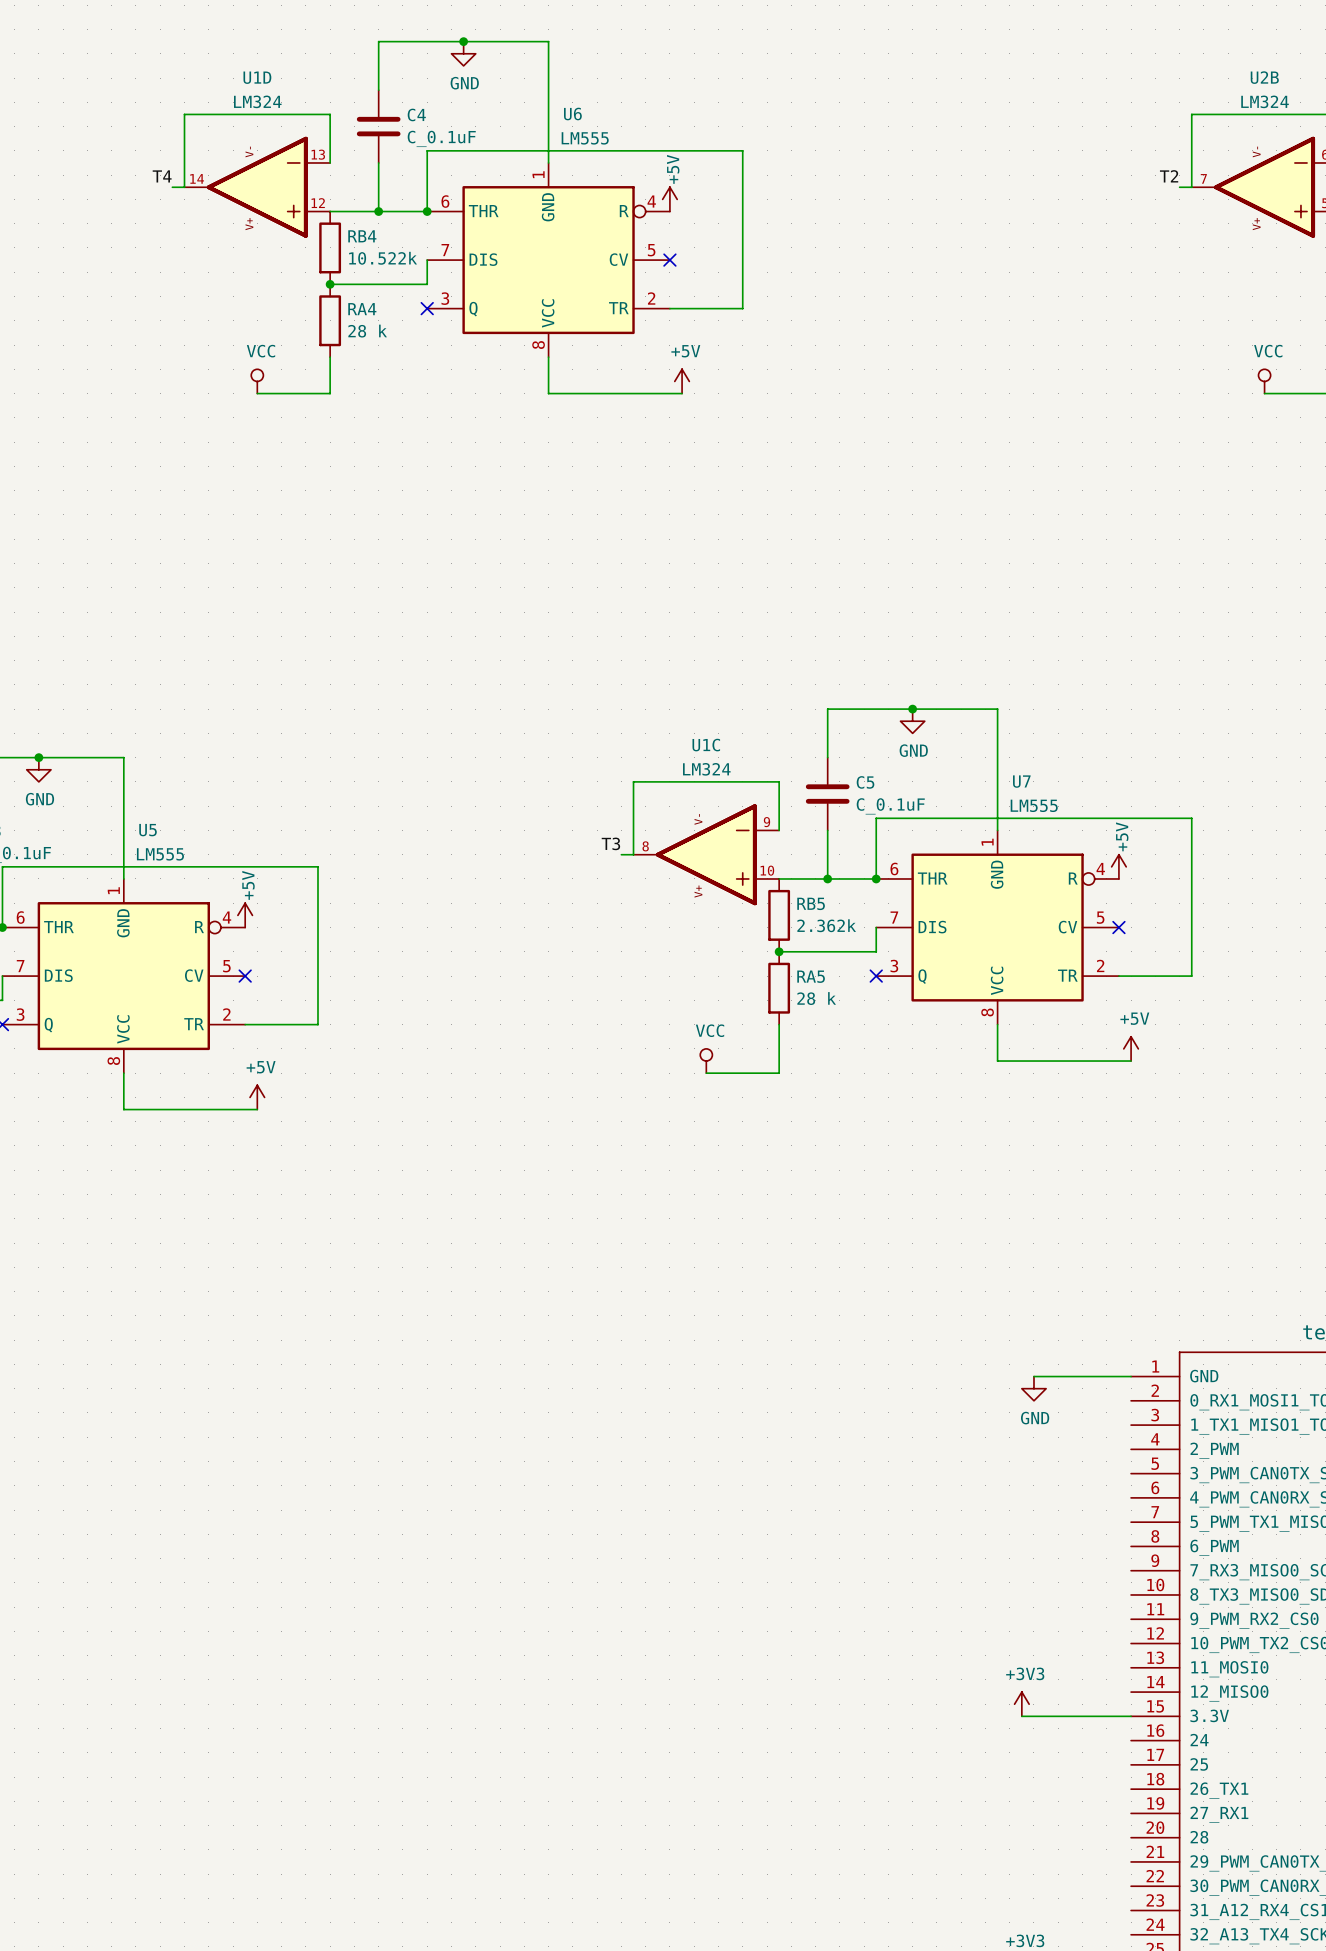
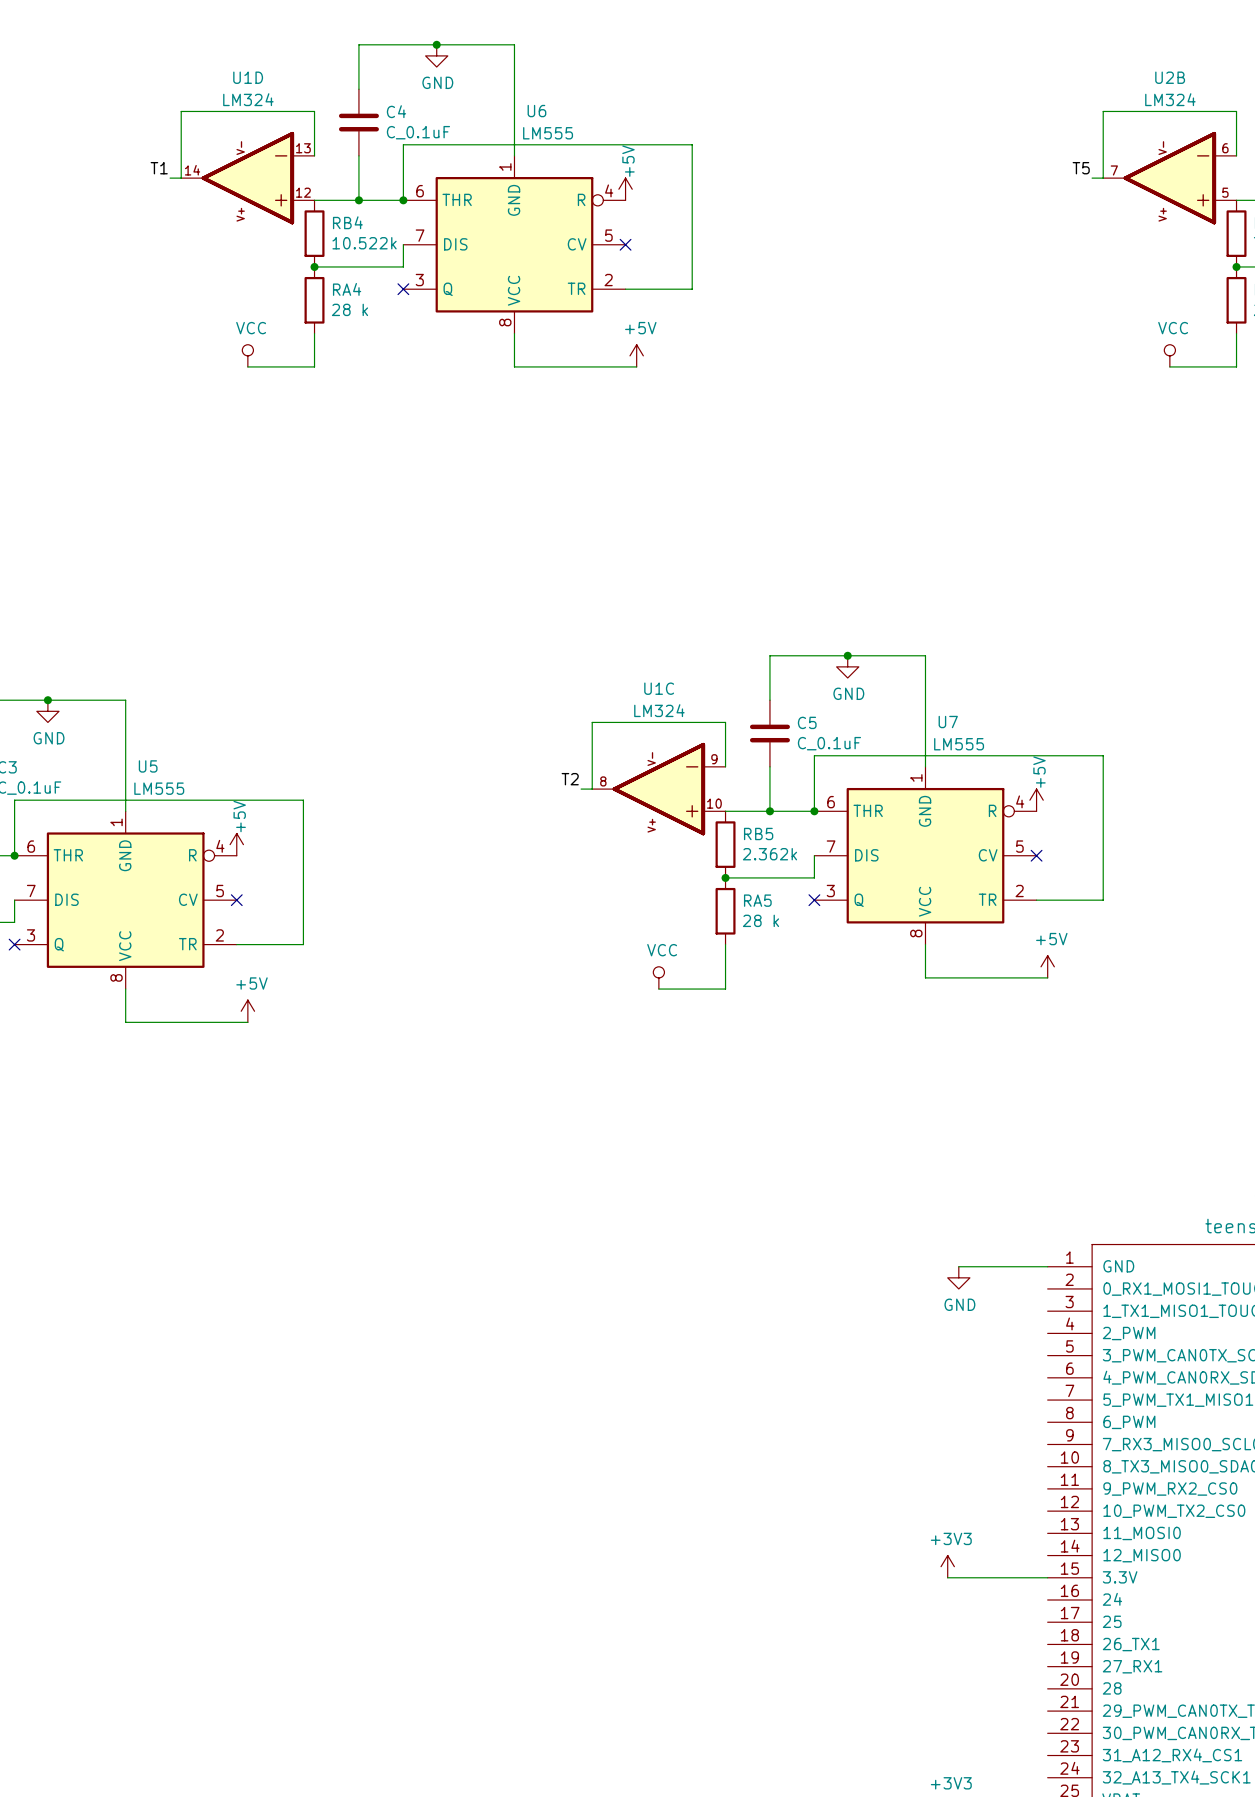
label: T4 (162, 176) -> T1 (159, 168)
label: T2 (1169, 176) -> T5 (1081, 168)
label: T3 (610, 843) -> T2 (570, 779)

